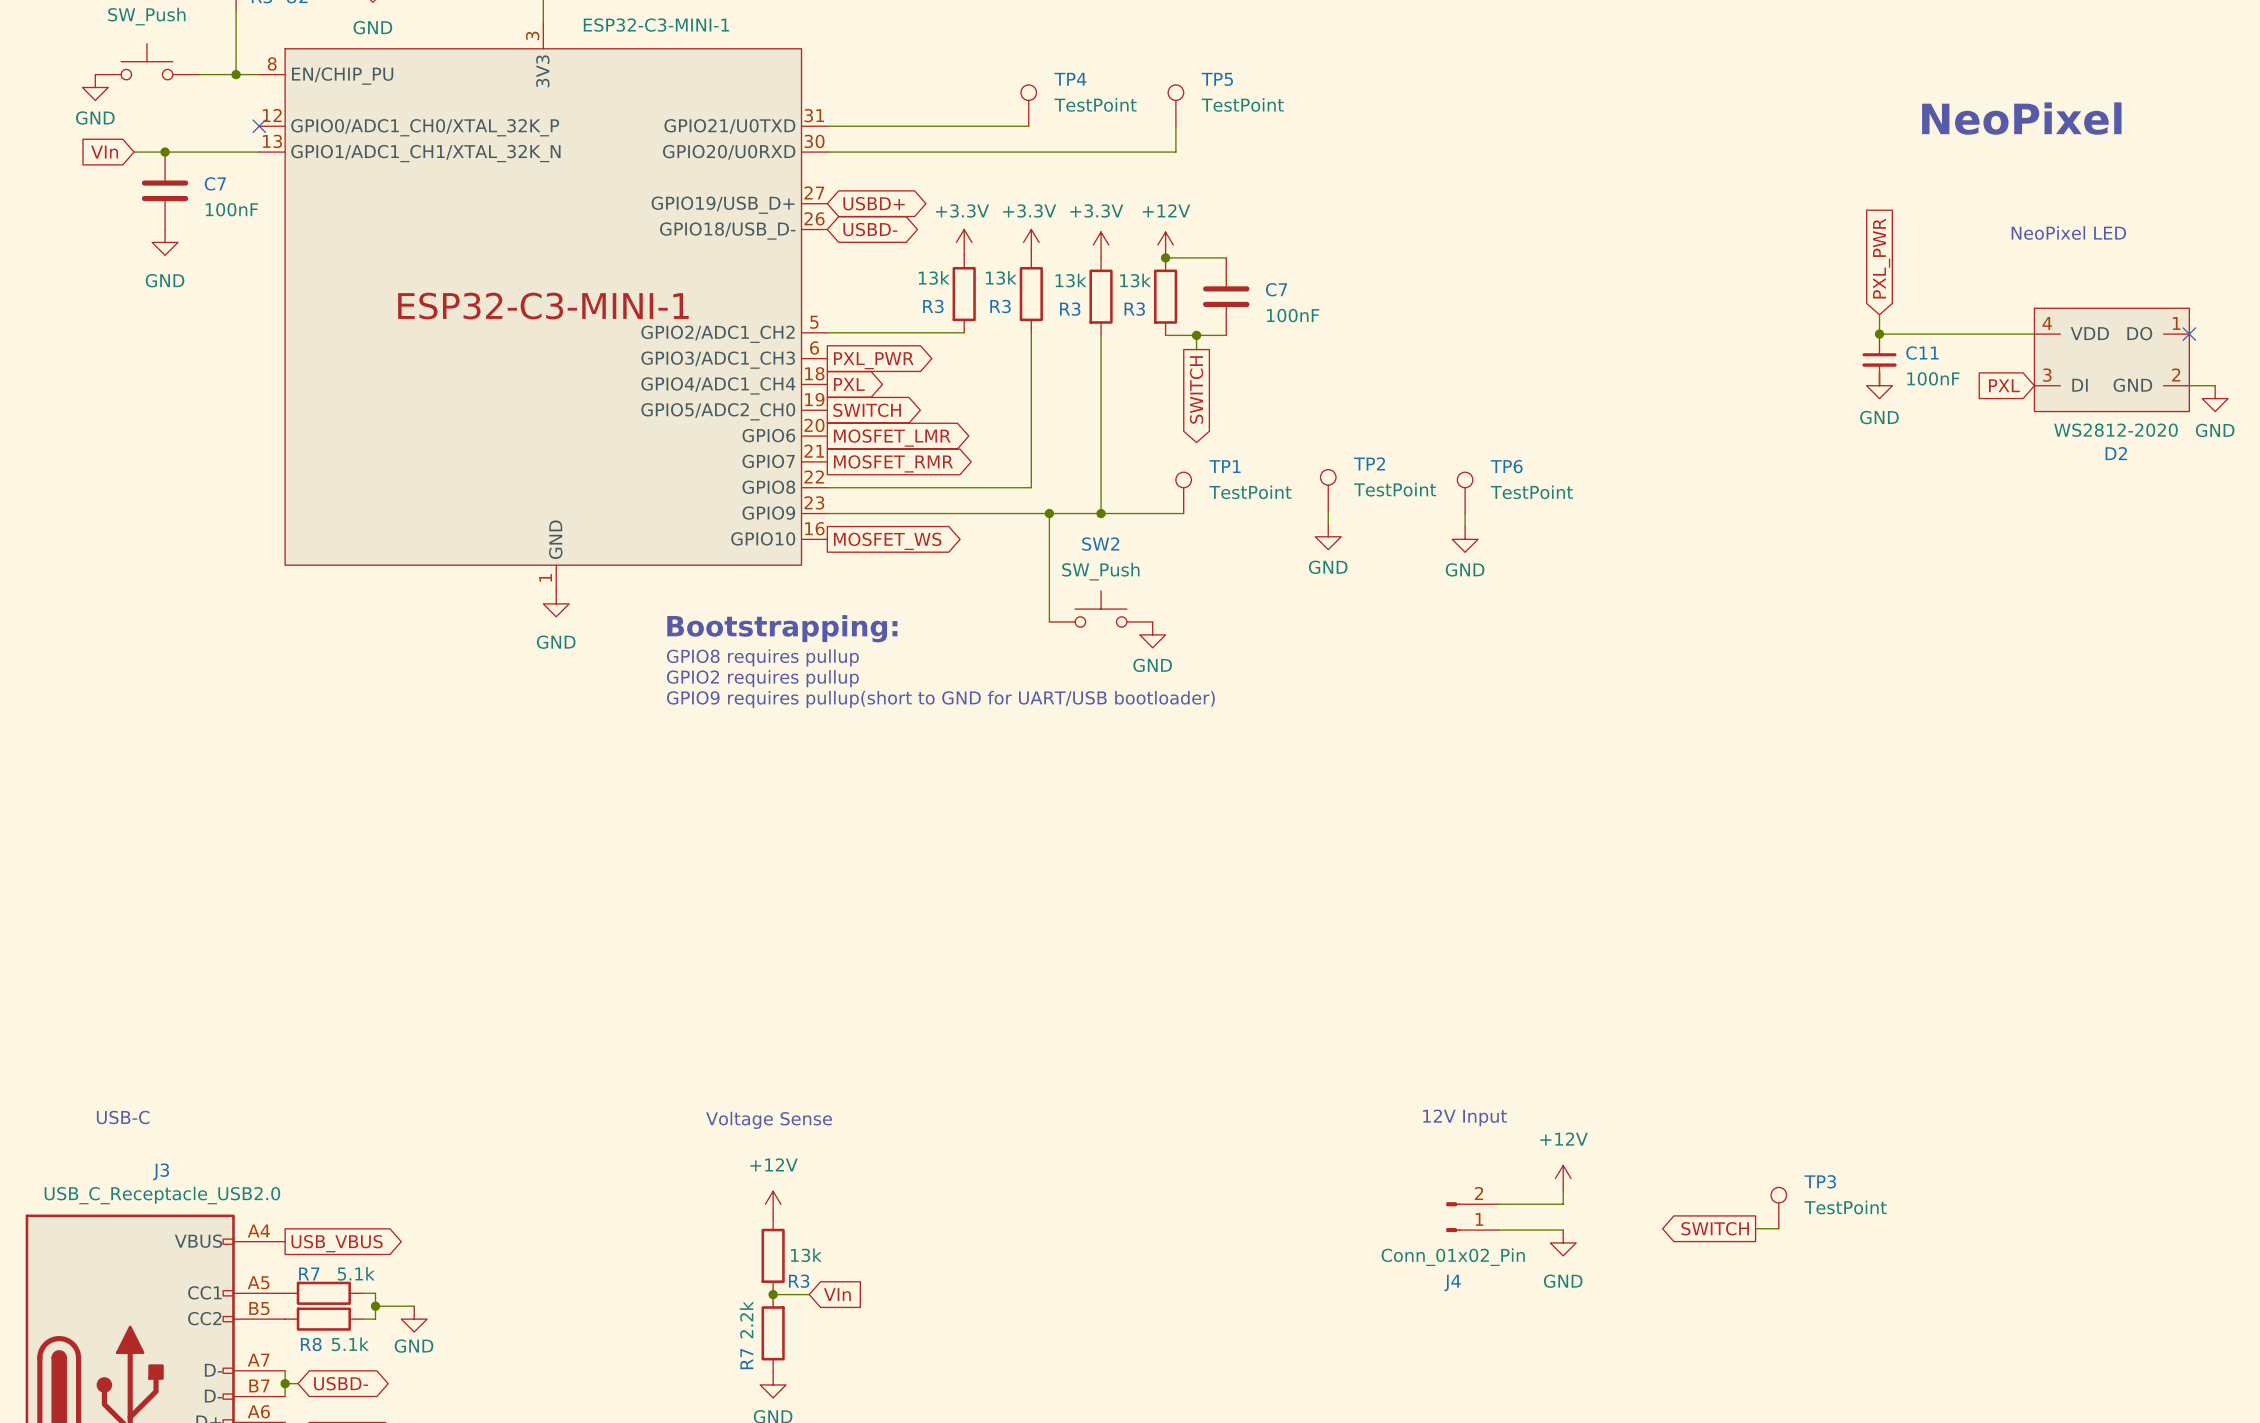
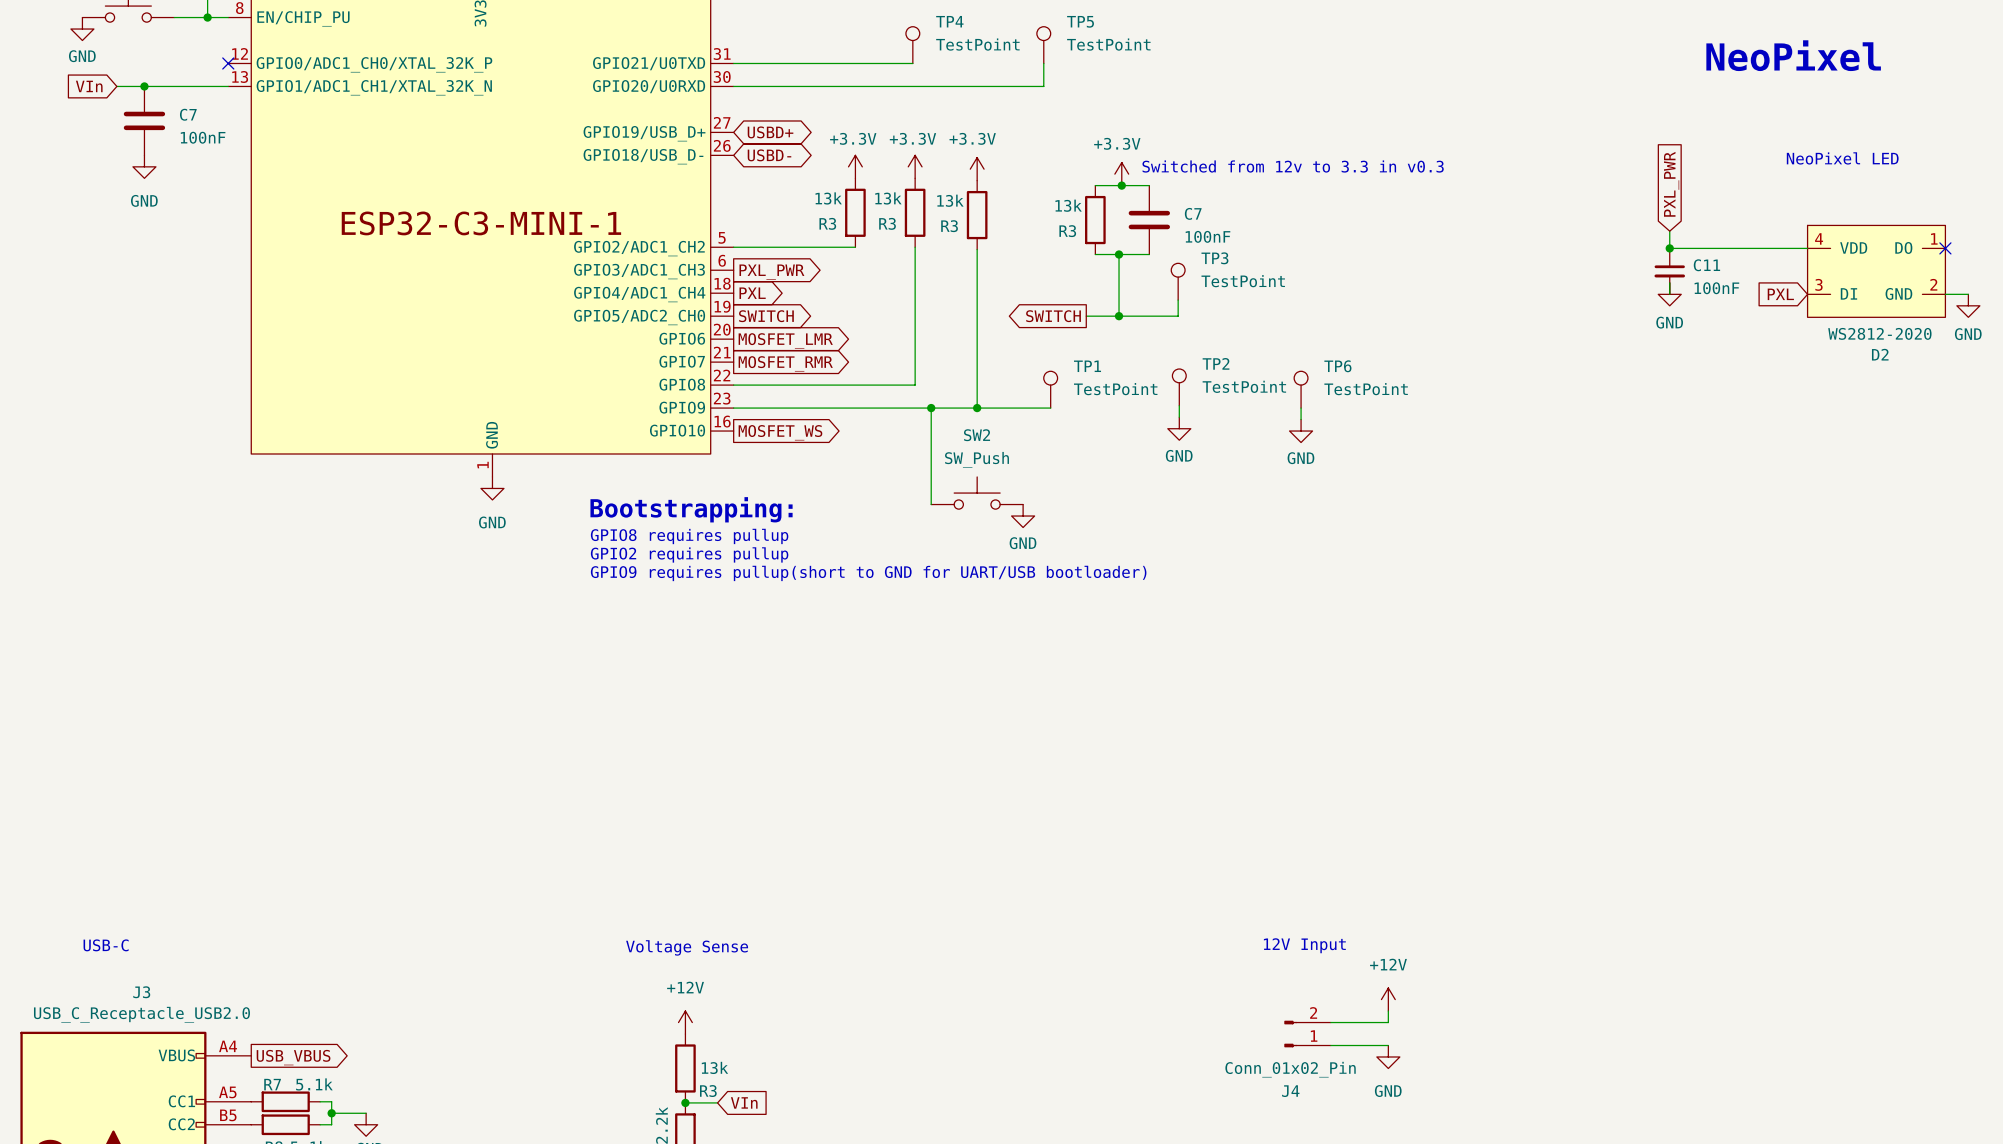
text: none -> Switched from 12v to 3.3 in v0.3 (1293, 166)
power symbol: +12V (1165, 245) -> none
power symbol: none -> +3.3V (1121, 174)
wire: (1165, 257) (1226, 257) -> (1095, 185) (1149, 185)
junction: (1165, 257) -> none
junction: none -> (1121, 185)
R3 position: (1165, 296) -> (1095, 220)
C7 position: (1226, 296) -> (1149, 220)
wire: (1165, 335) (1226, 335) -> (1095, 254) (1149, 254)
wire: (1196, 335) (1196, 349) -> none
junction: (1196, 335) -> none
wire: none -> (1119, 254) (1119, 316)
junction: none -> (1119, 254)
global label rotation: 0° (1196, 389) -> 90° clockwise (1053, 316)
wire: none -> (1178, 300) (1178, 316) (1086, 316)
junction: none -> (1119, 316)
TP3 position: (1778, 1208) -> (1178, 281)
global label: SWITCH (1715, 1228) -> none
wire: (1755, 1228) (1778, 1228) -> none

